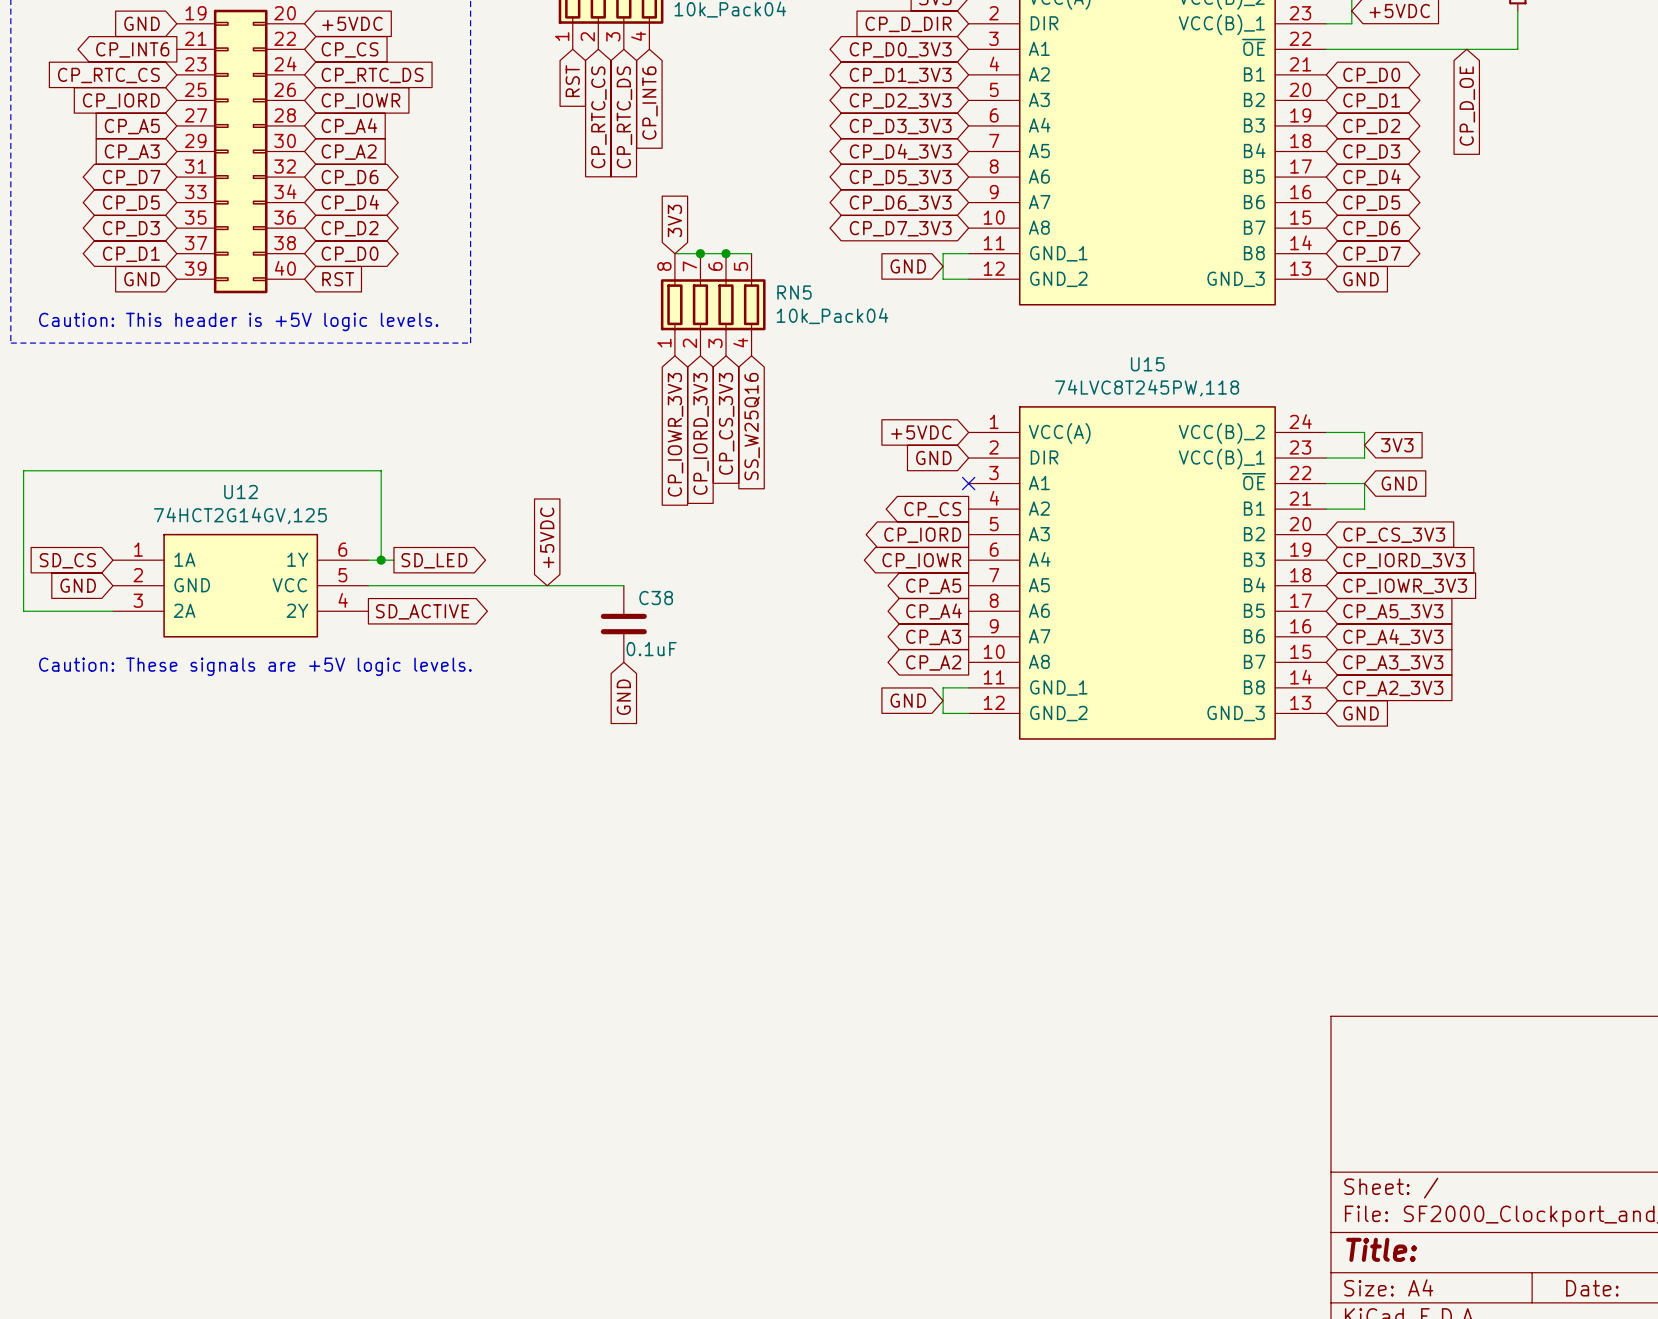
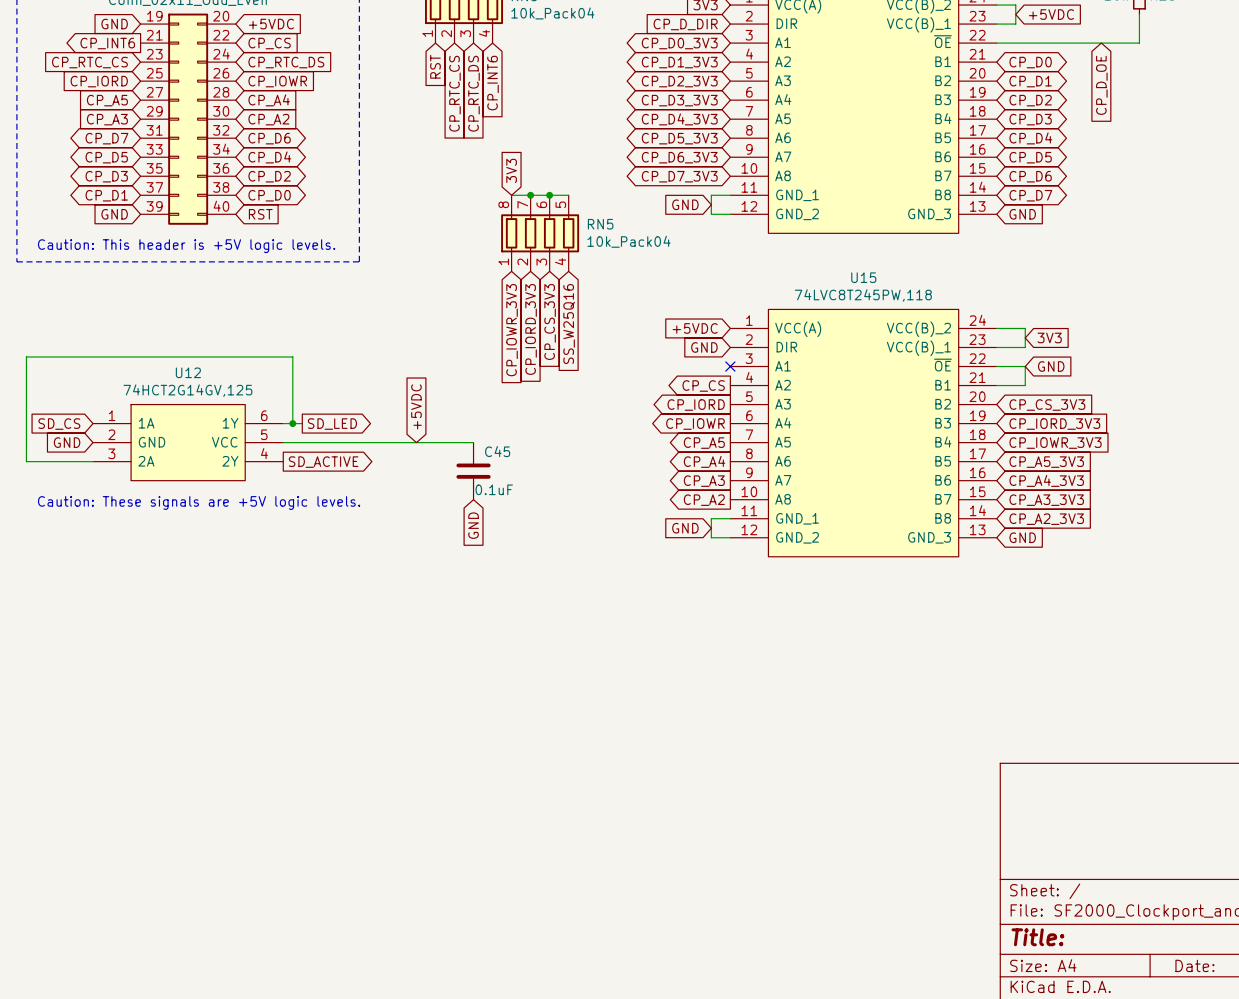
C38 name: C38 (656, 598) -> C45 (497, 451)

